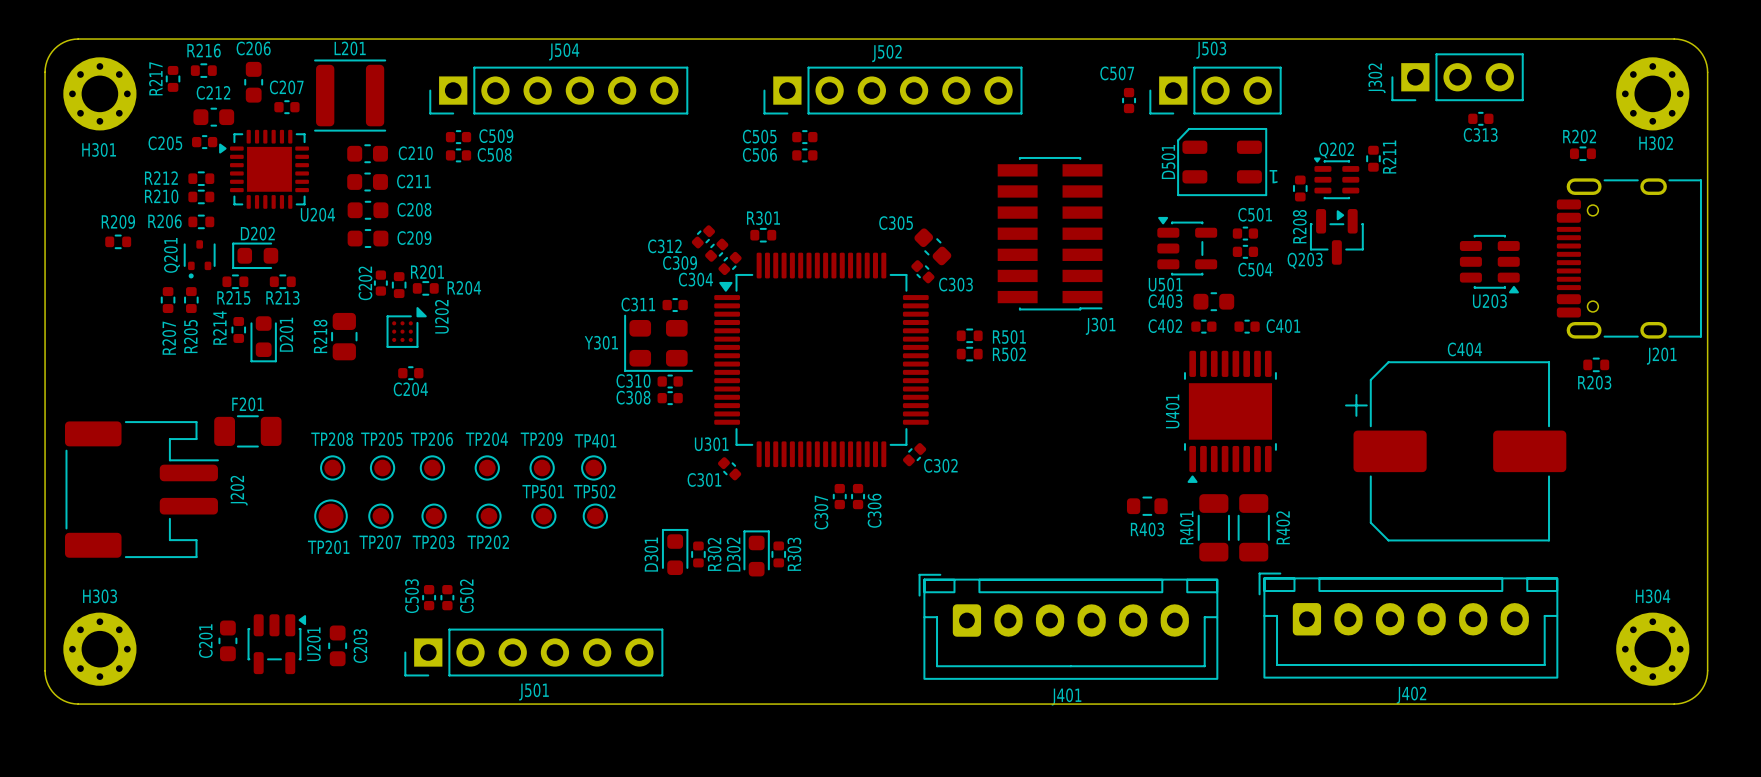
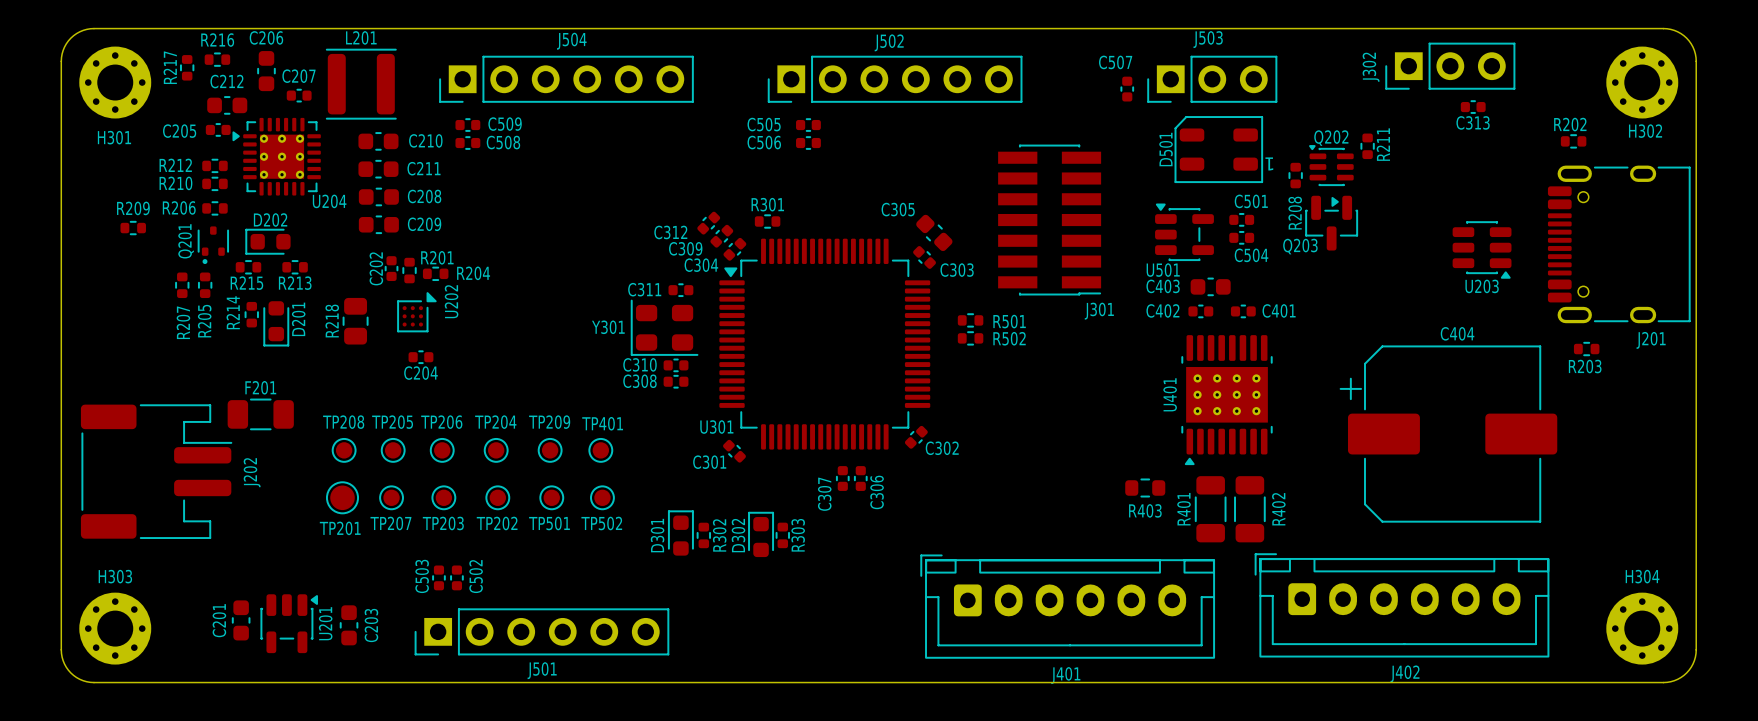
U204 footprint: [219, 129, 309, 209] -> [232, 117, 321, 196]
U401 footprint: [1184, 350, 1277, 483] -> [1181, 335, 1273, 466]
TP501 name position: TP501 (543, 491) -> TP501 (549, 523)
TP502 name position: TP502 (594, 491) -> TP502 (601, 523)

